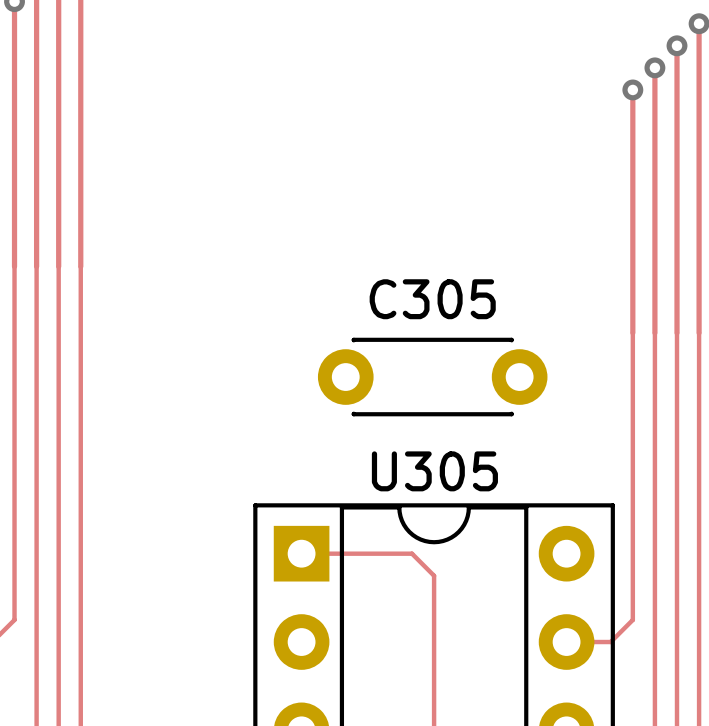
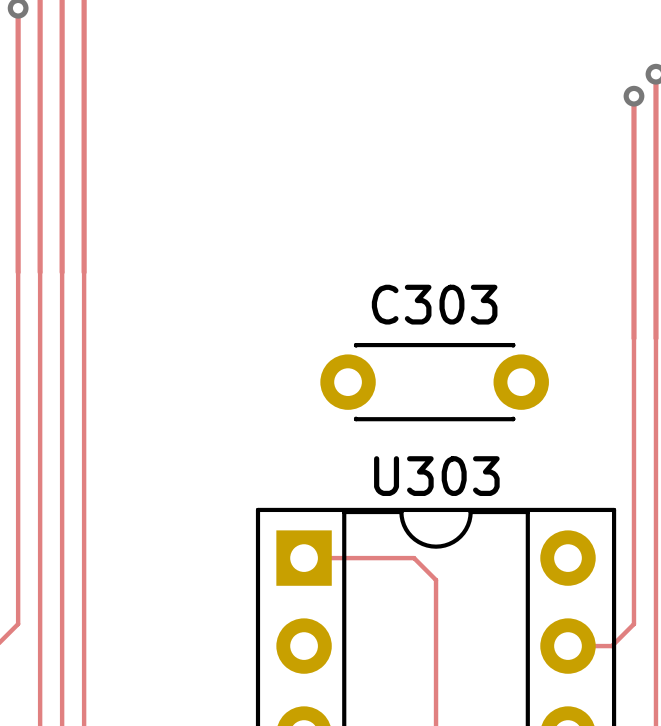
C305 name: C305 (432, 299) -> C303 (434, 304)
U305 name: U305 (434, 471) -> U303 (436, 476)

